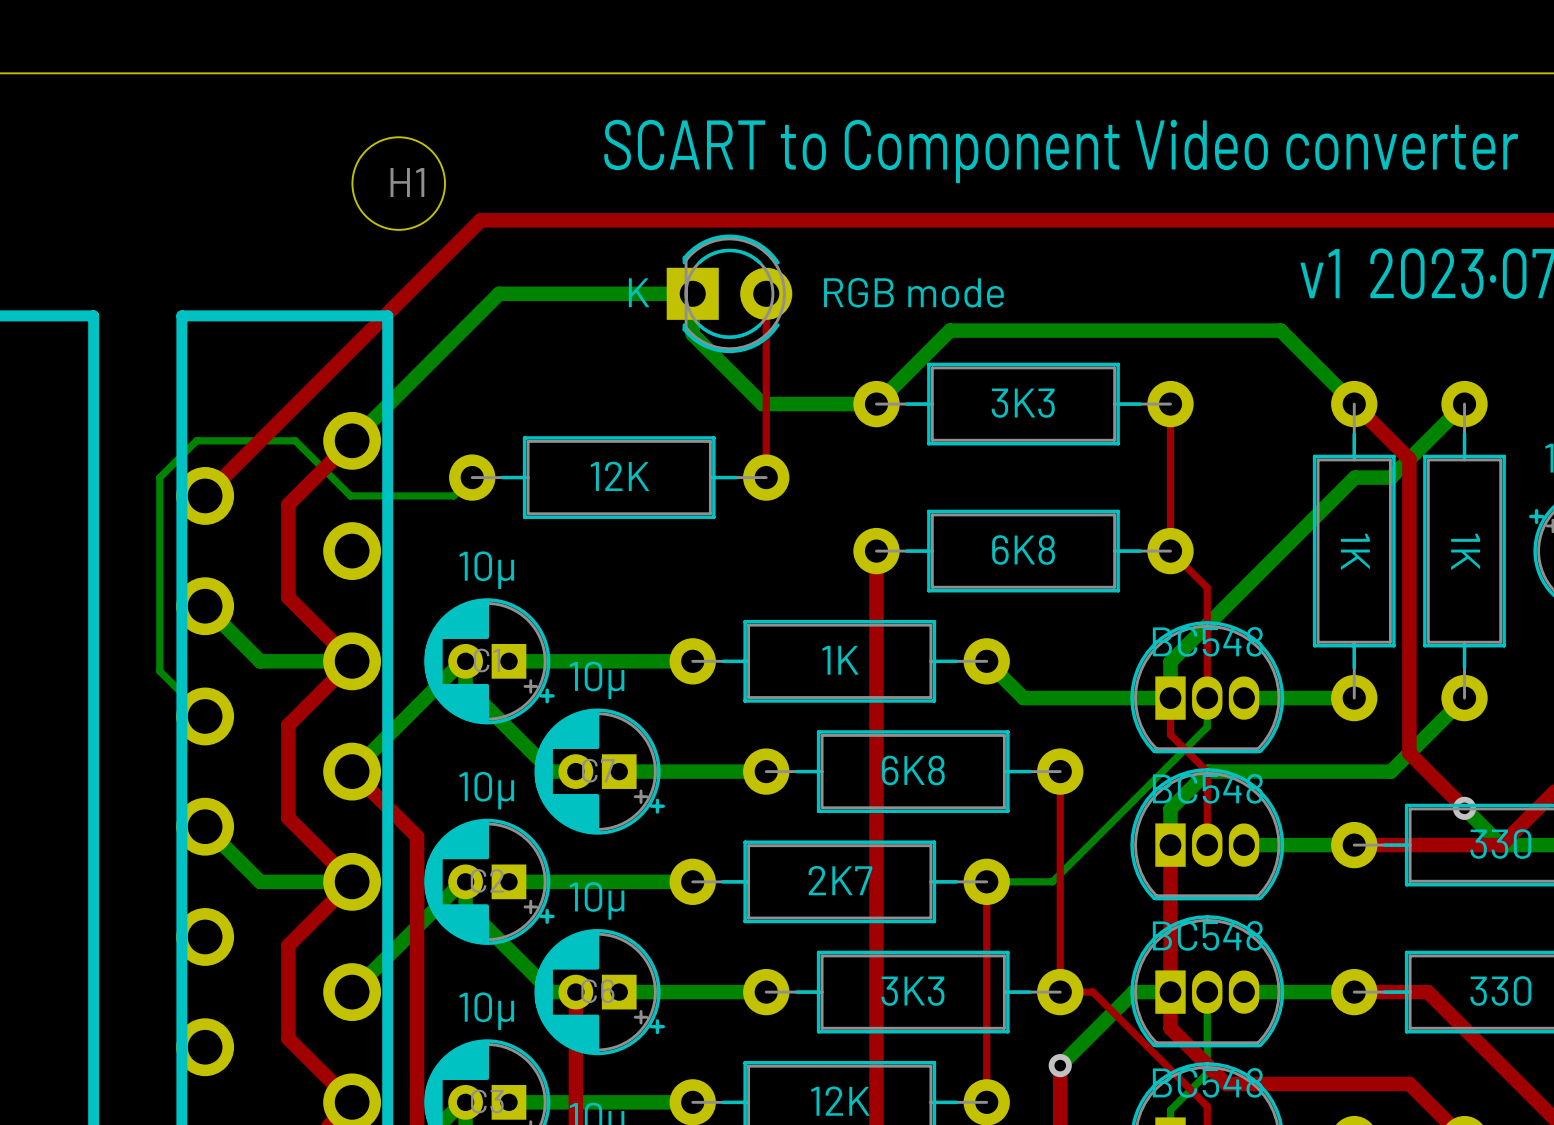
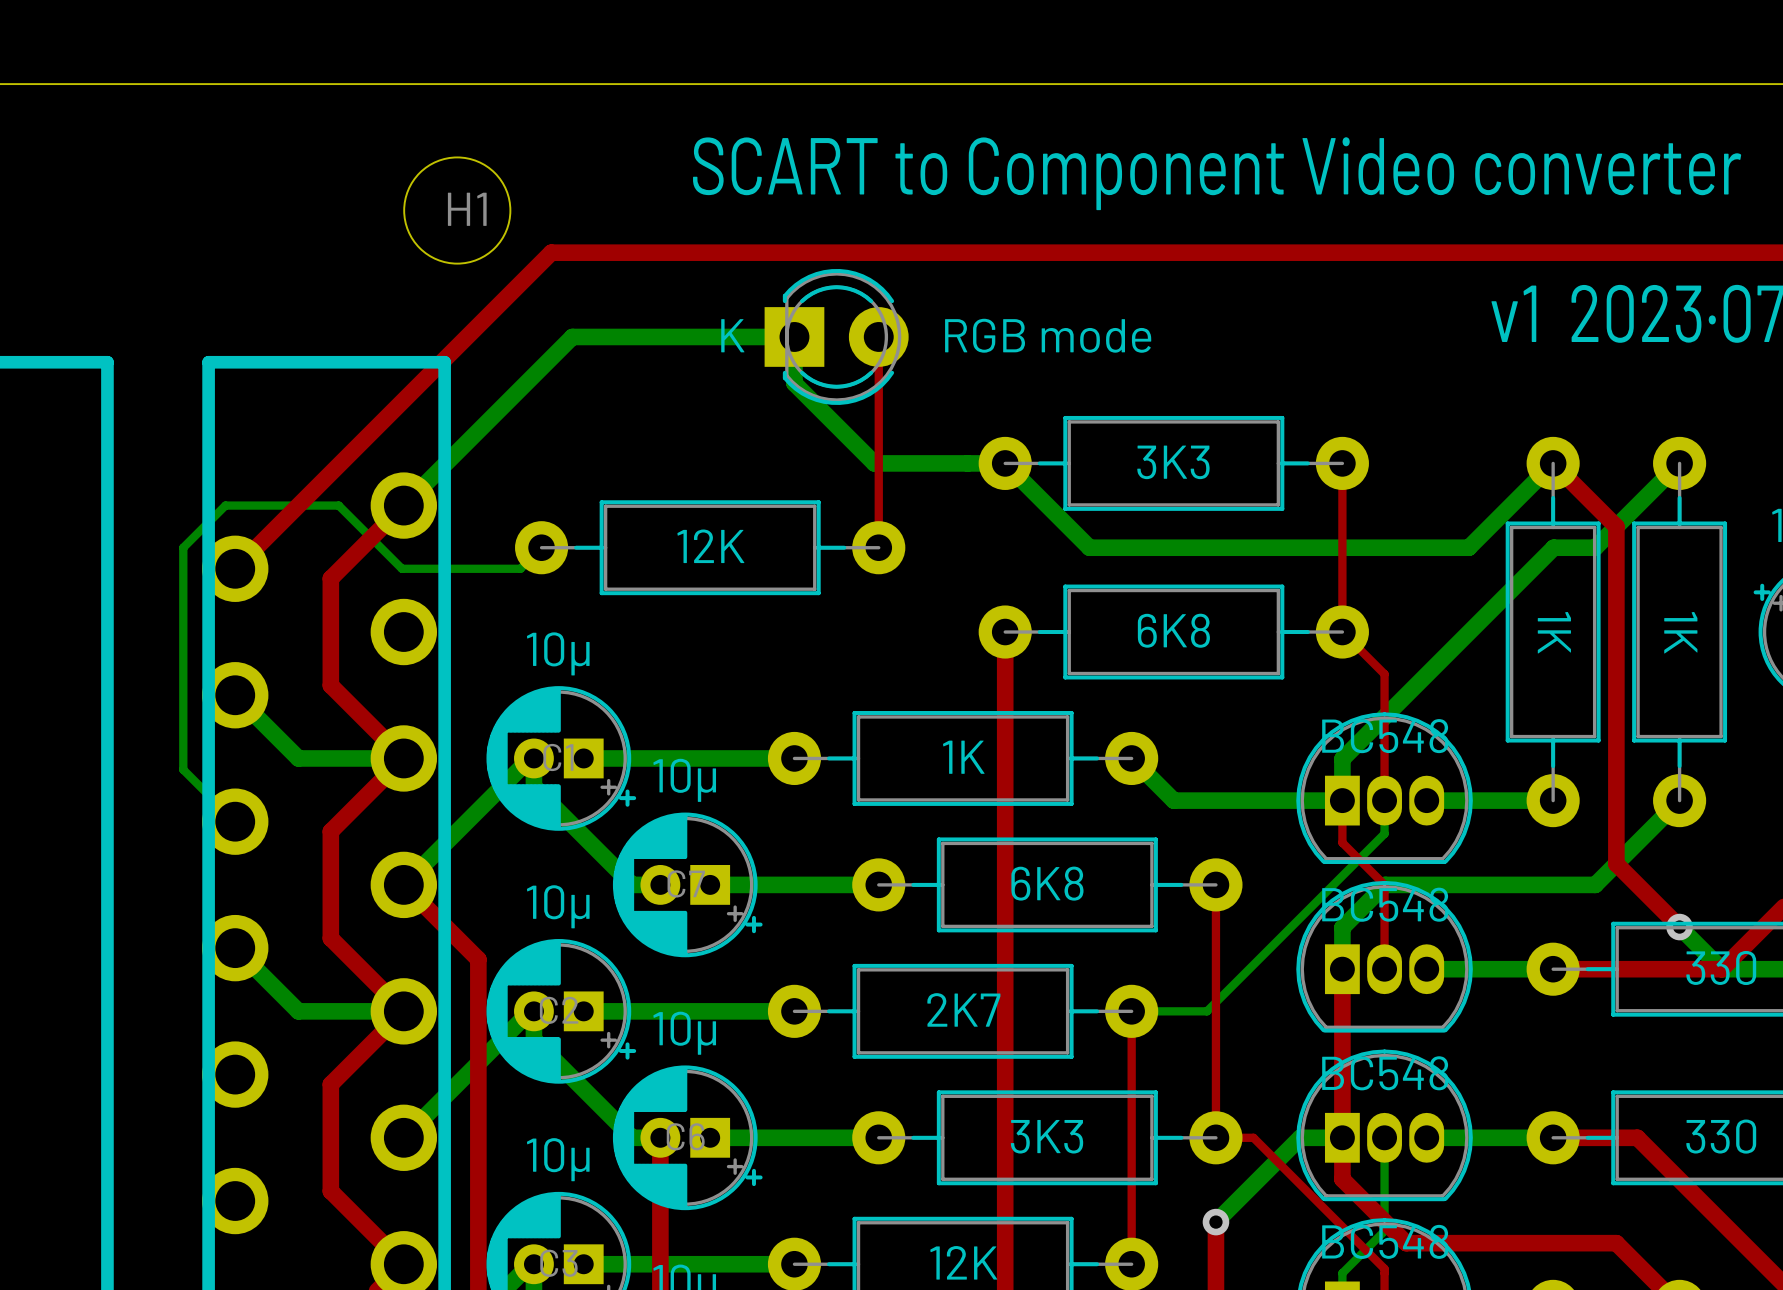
bottom track: (876, 404) (950, 330) (1280, 330) (1354, 404) -> (1005, 463) (1089, 547) (1468, 547) (1553, 463)

